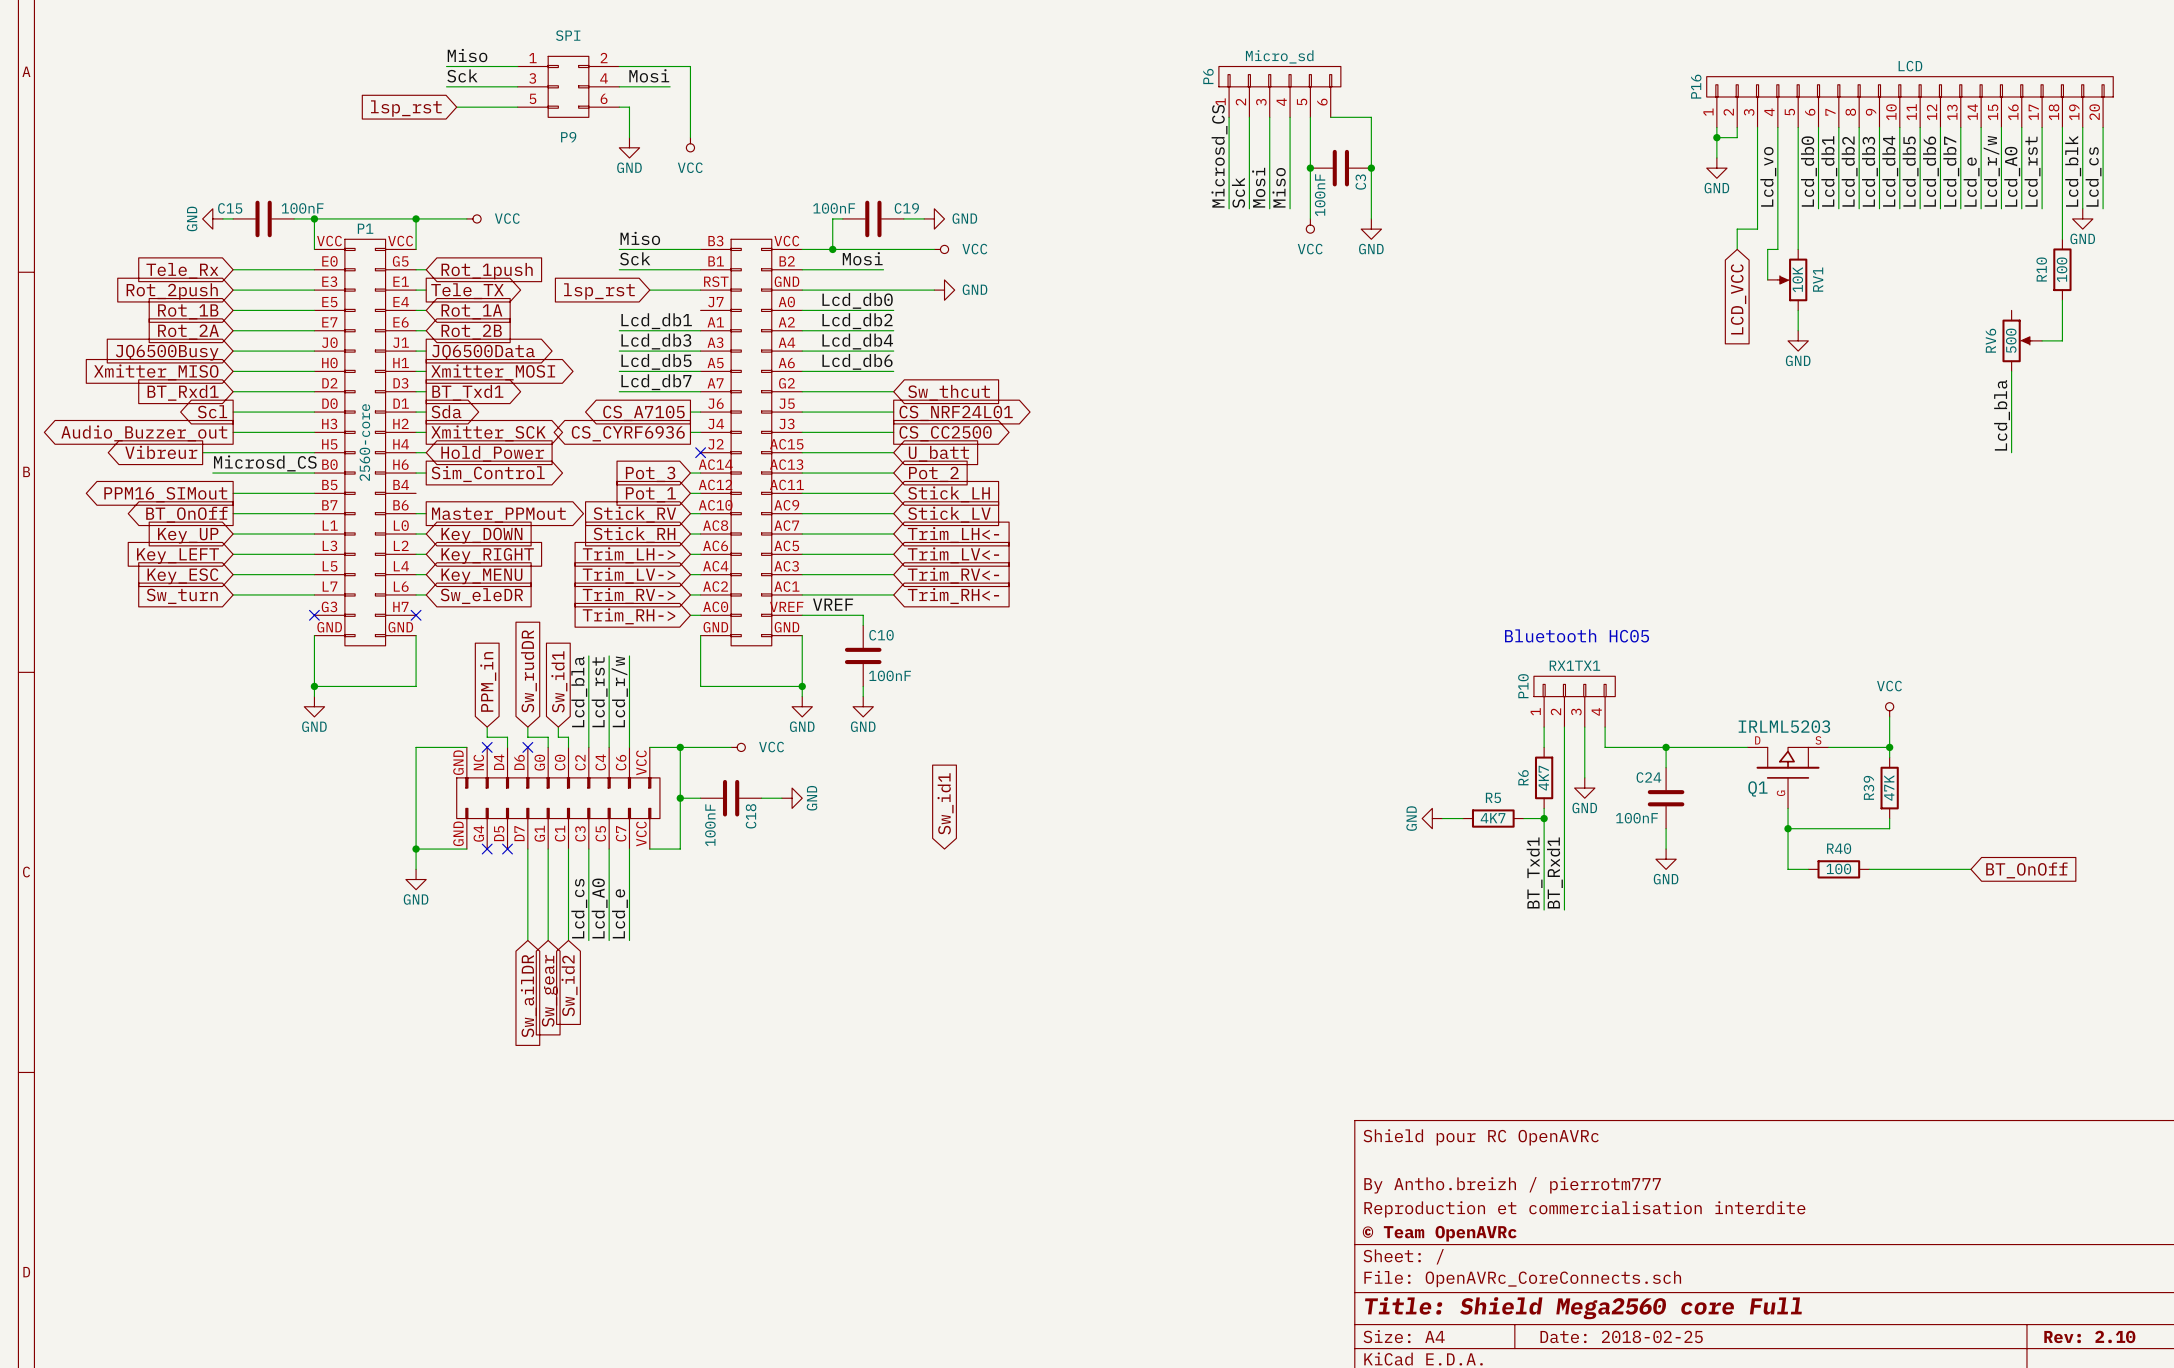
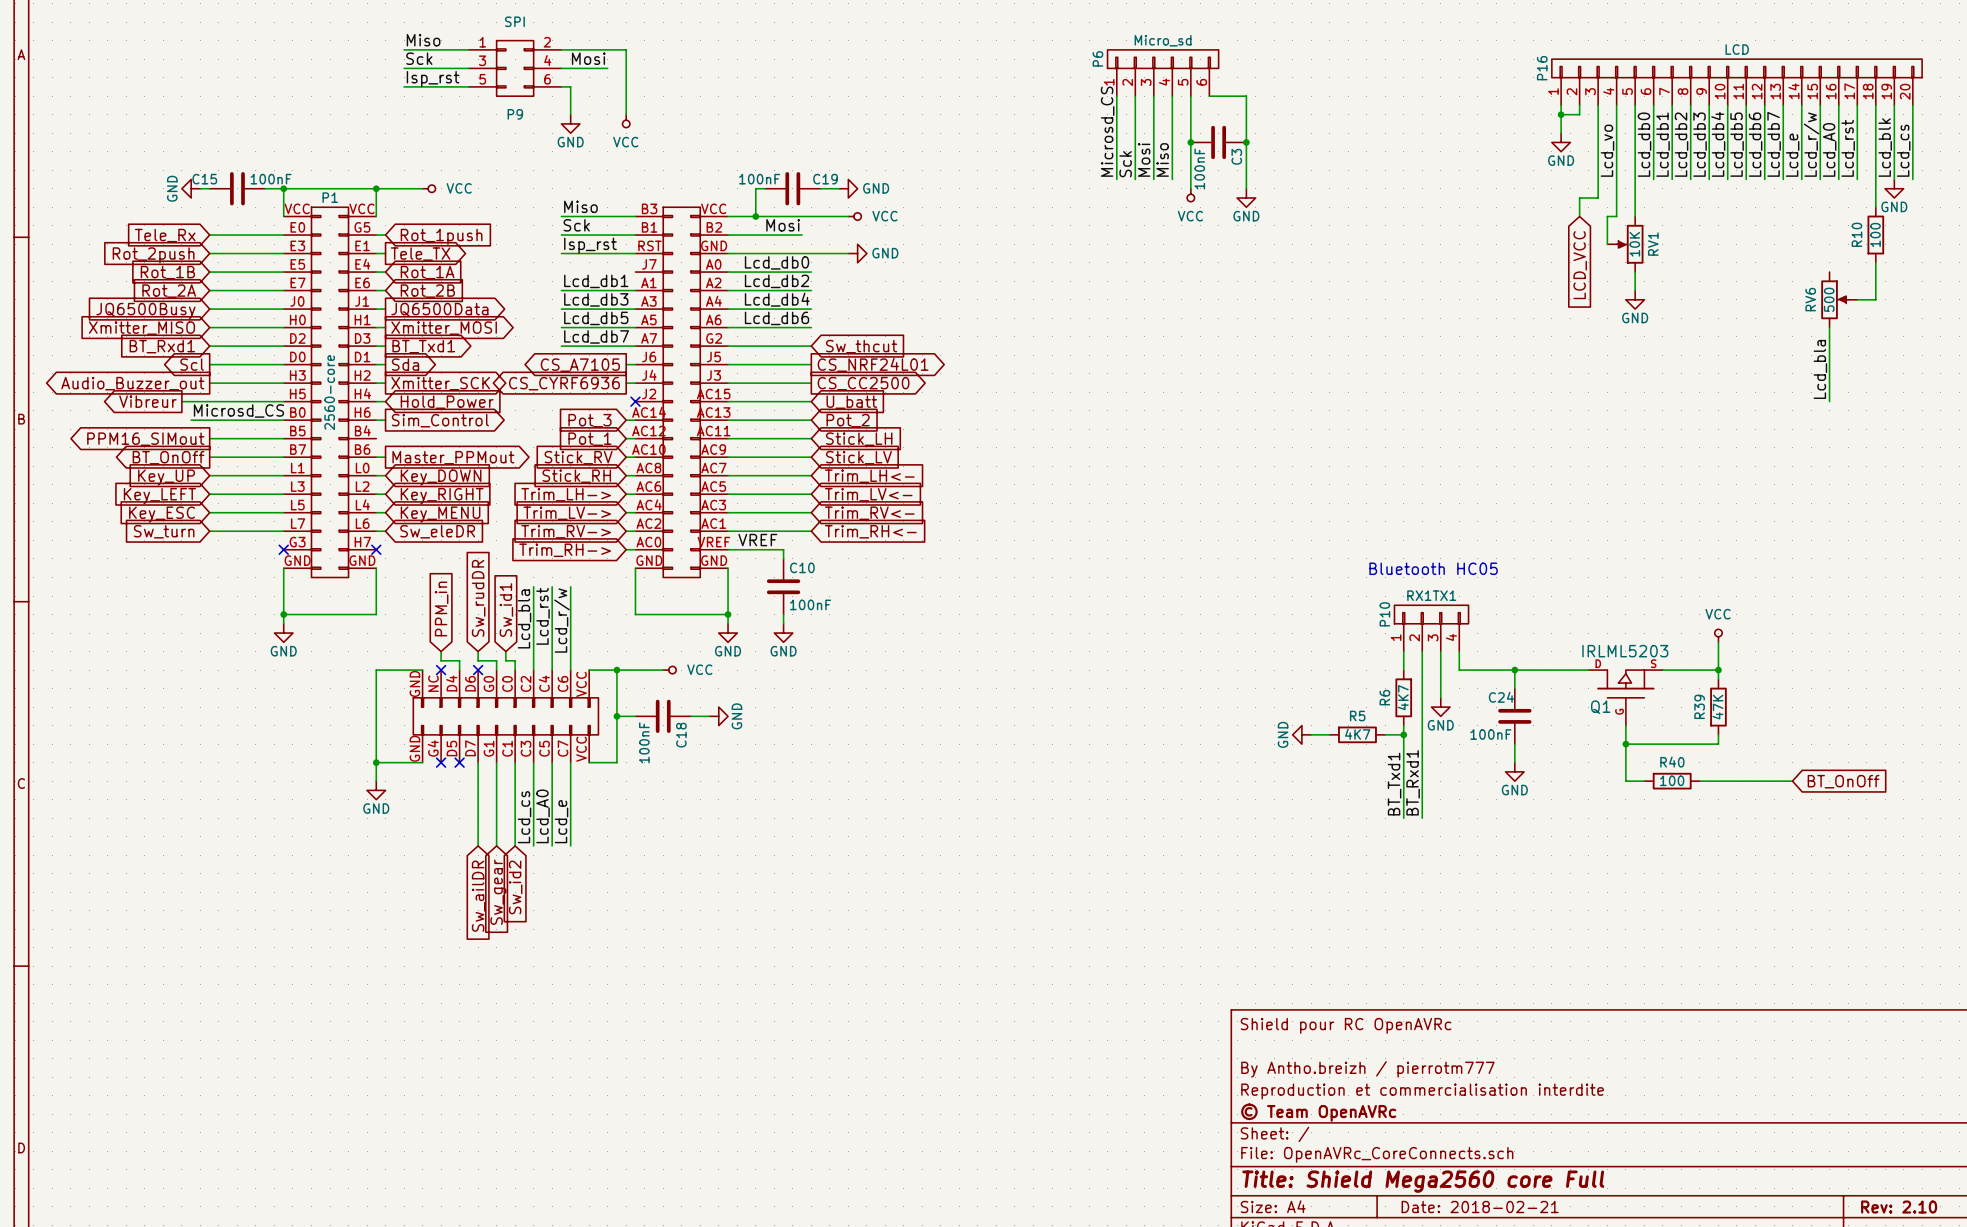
label: none -> Isp_rst (433, 79)
wire: none -> (404, 86) (413, 86)
global label: lsp_rst (406, 108) -> none
label: none -> Isp_rst (590, 245)
wire: none -> (561, 253) (589, 253)
global label: lsp_rst (599, 291) -> none
global label: Sw_id1 (945, 803) -> none
title block: Date: 2018-02-25 (1621, 1336) -> Date: 2018-02-21 (1480, 1207)

